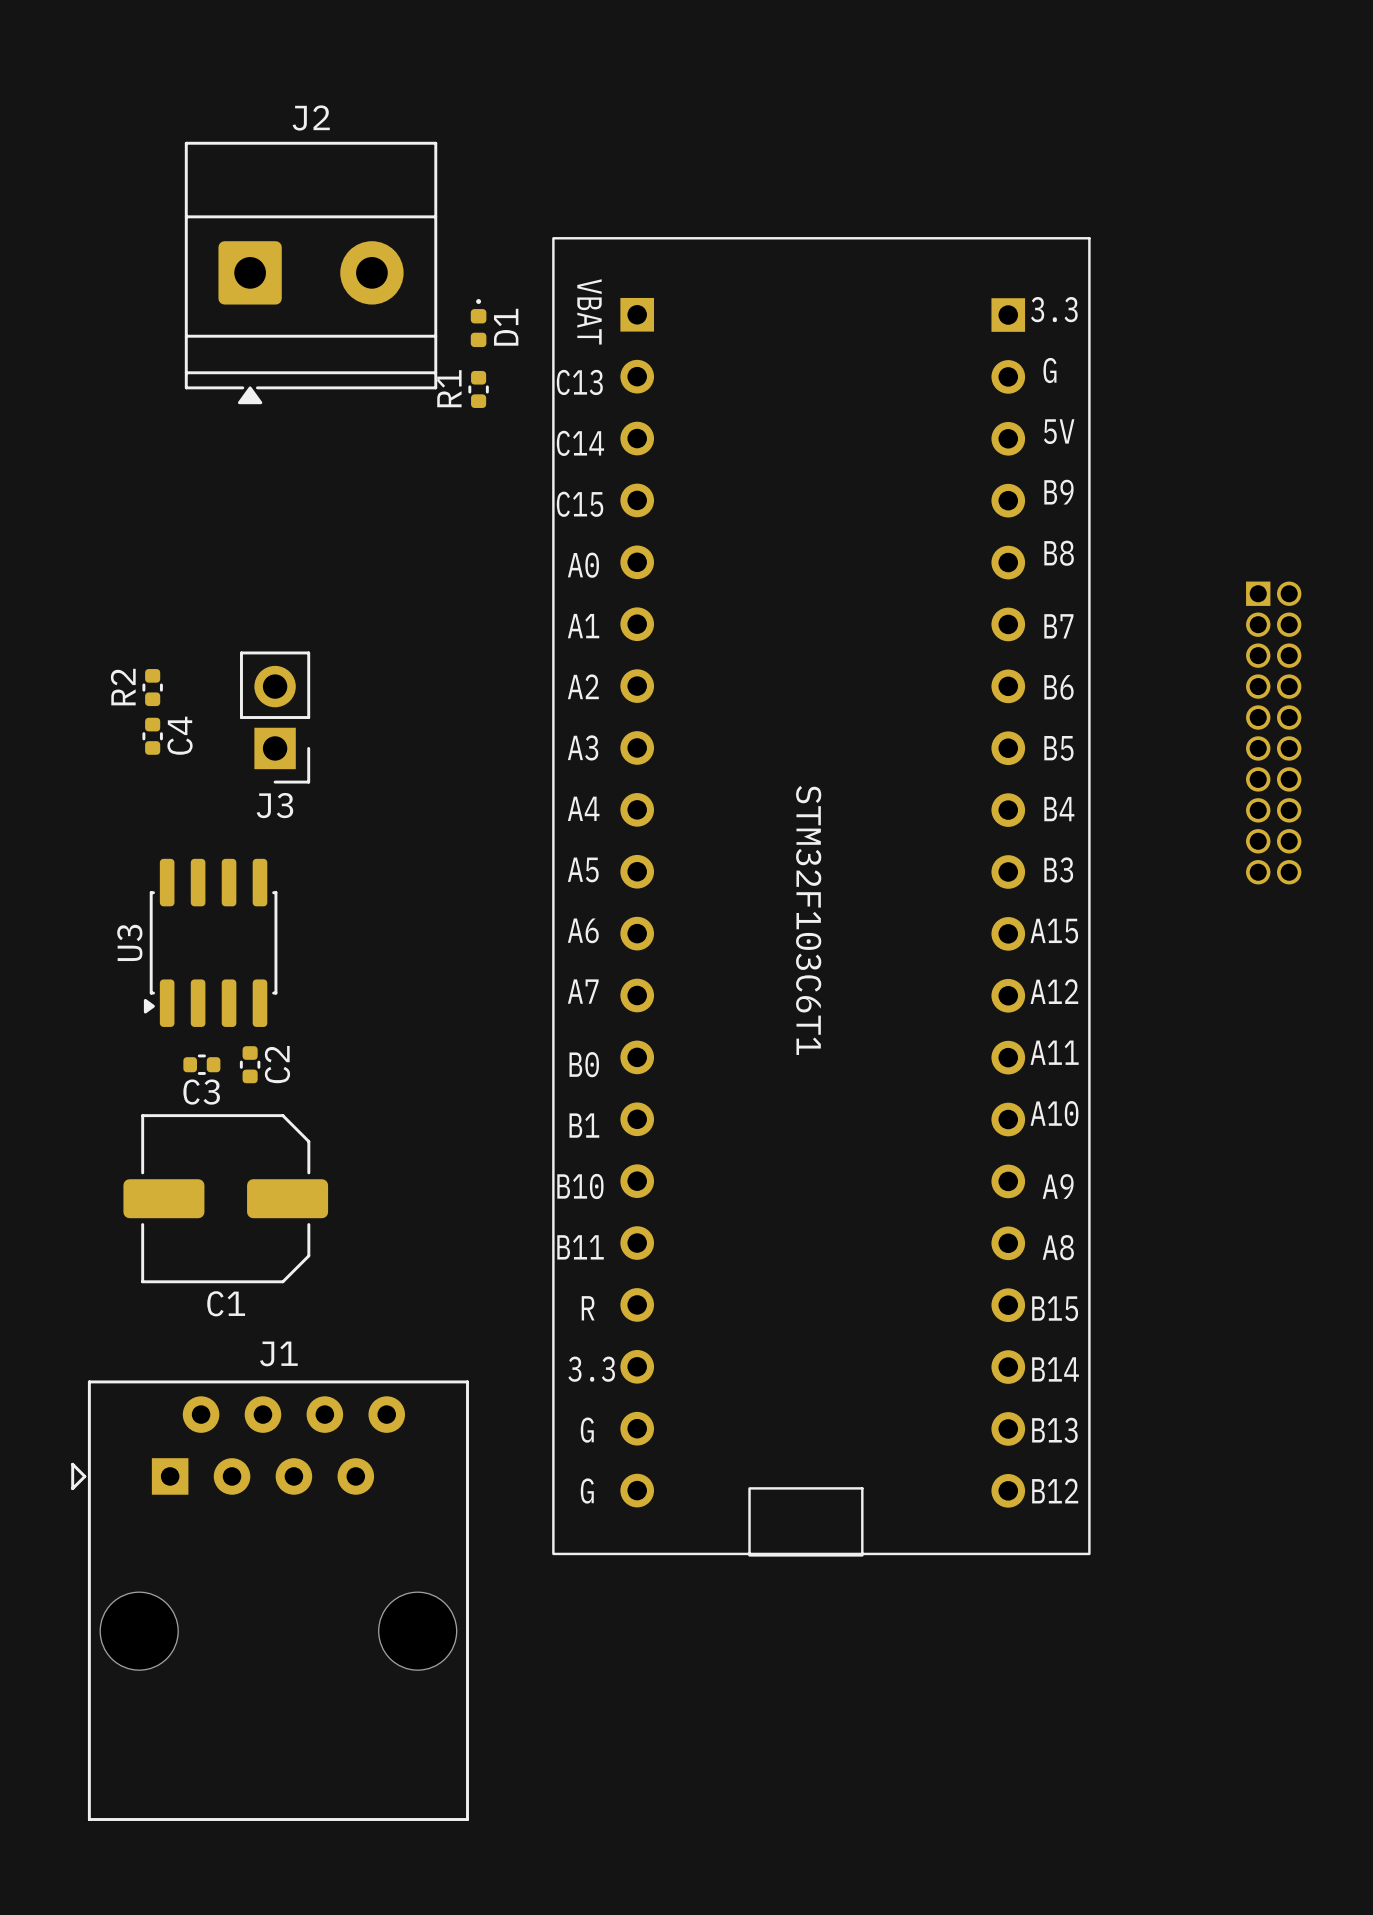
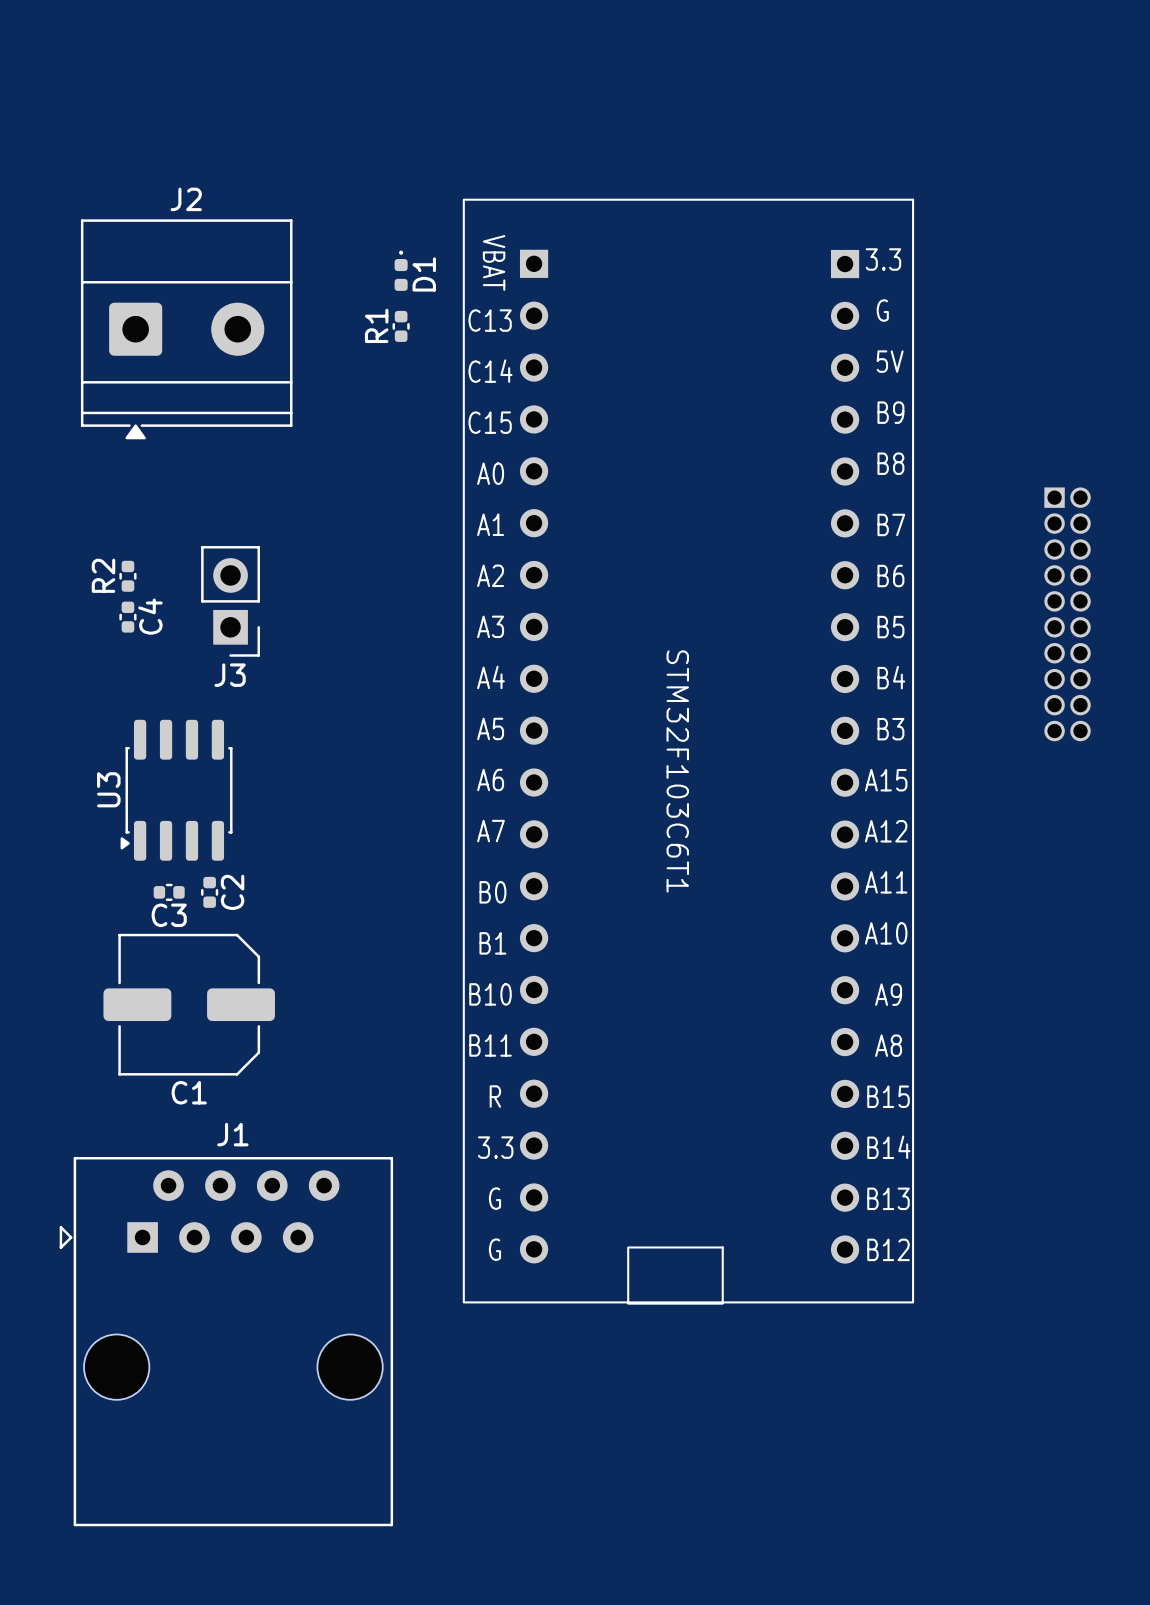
J2 position: (311, 273) -> (186, 329)

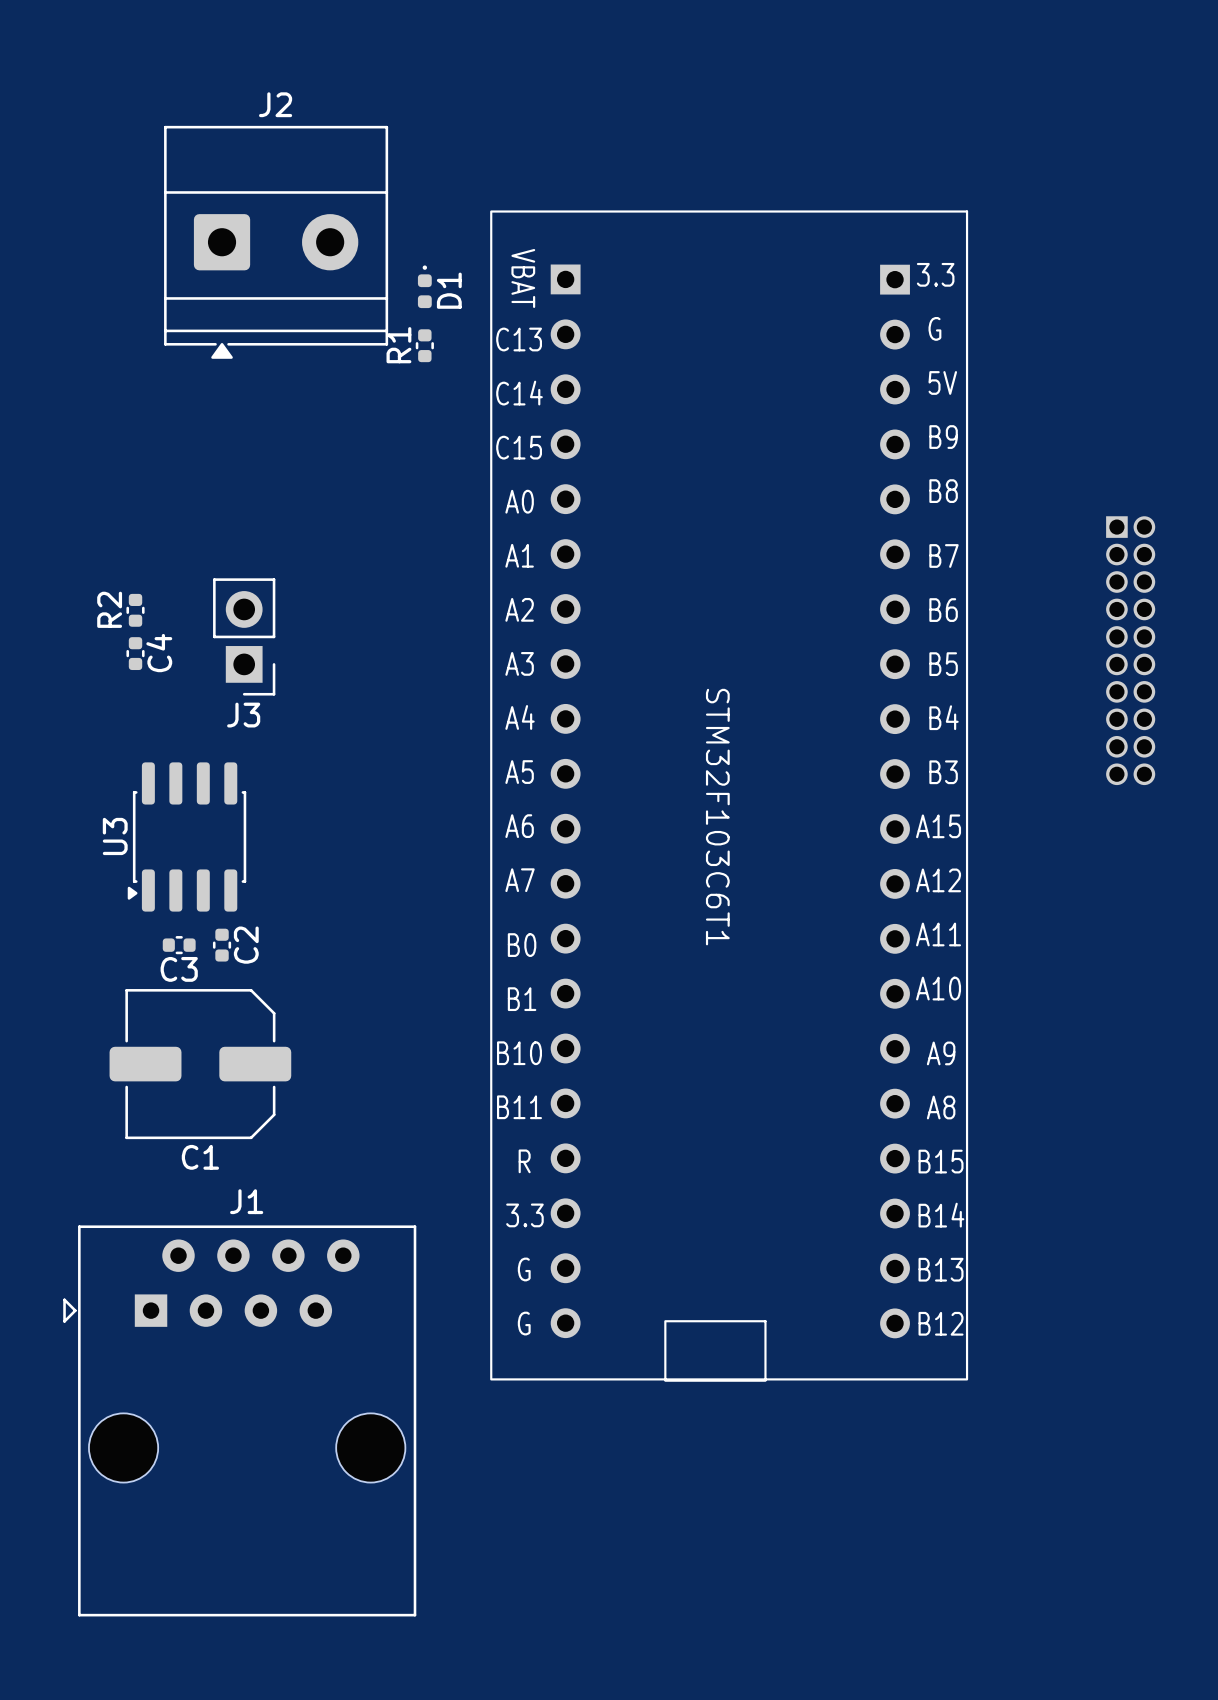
J2 position: (186, 329) -> (276, 242)

